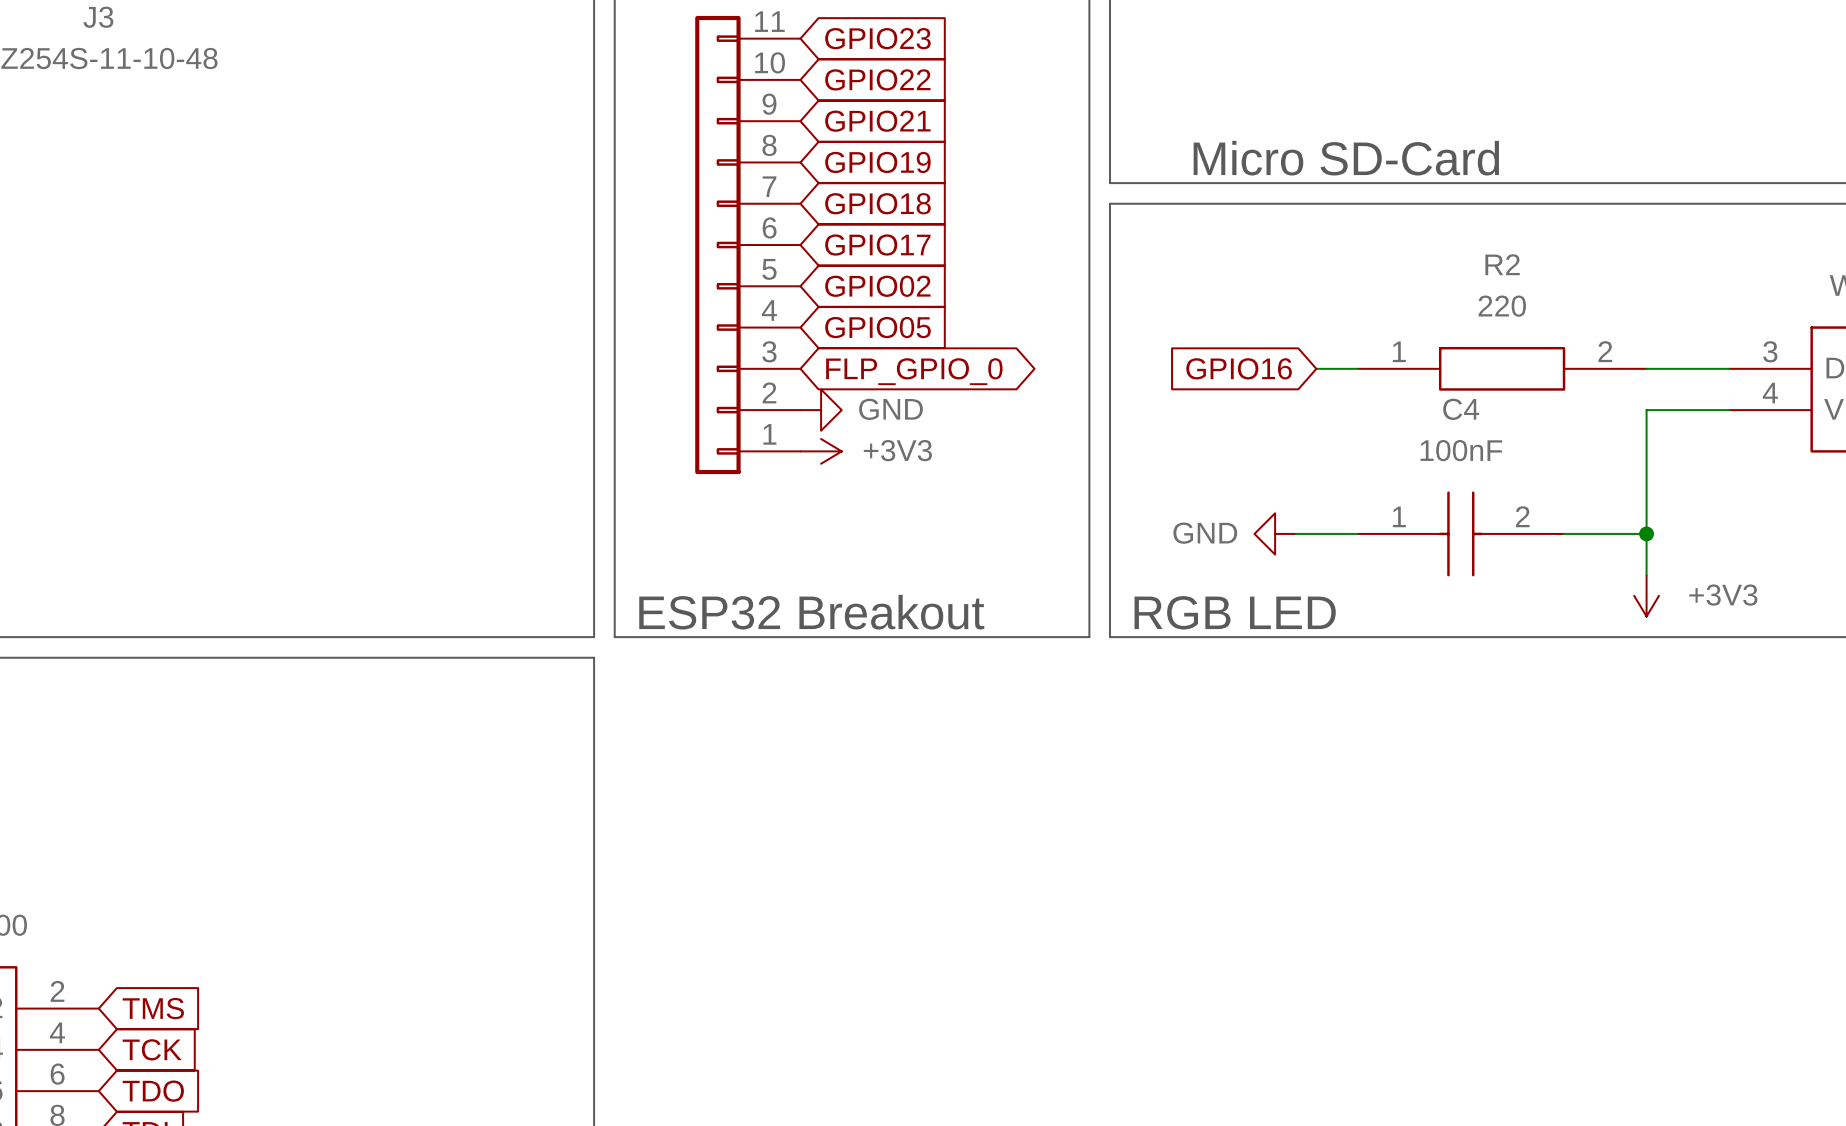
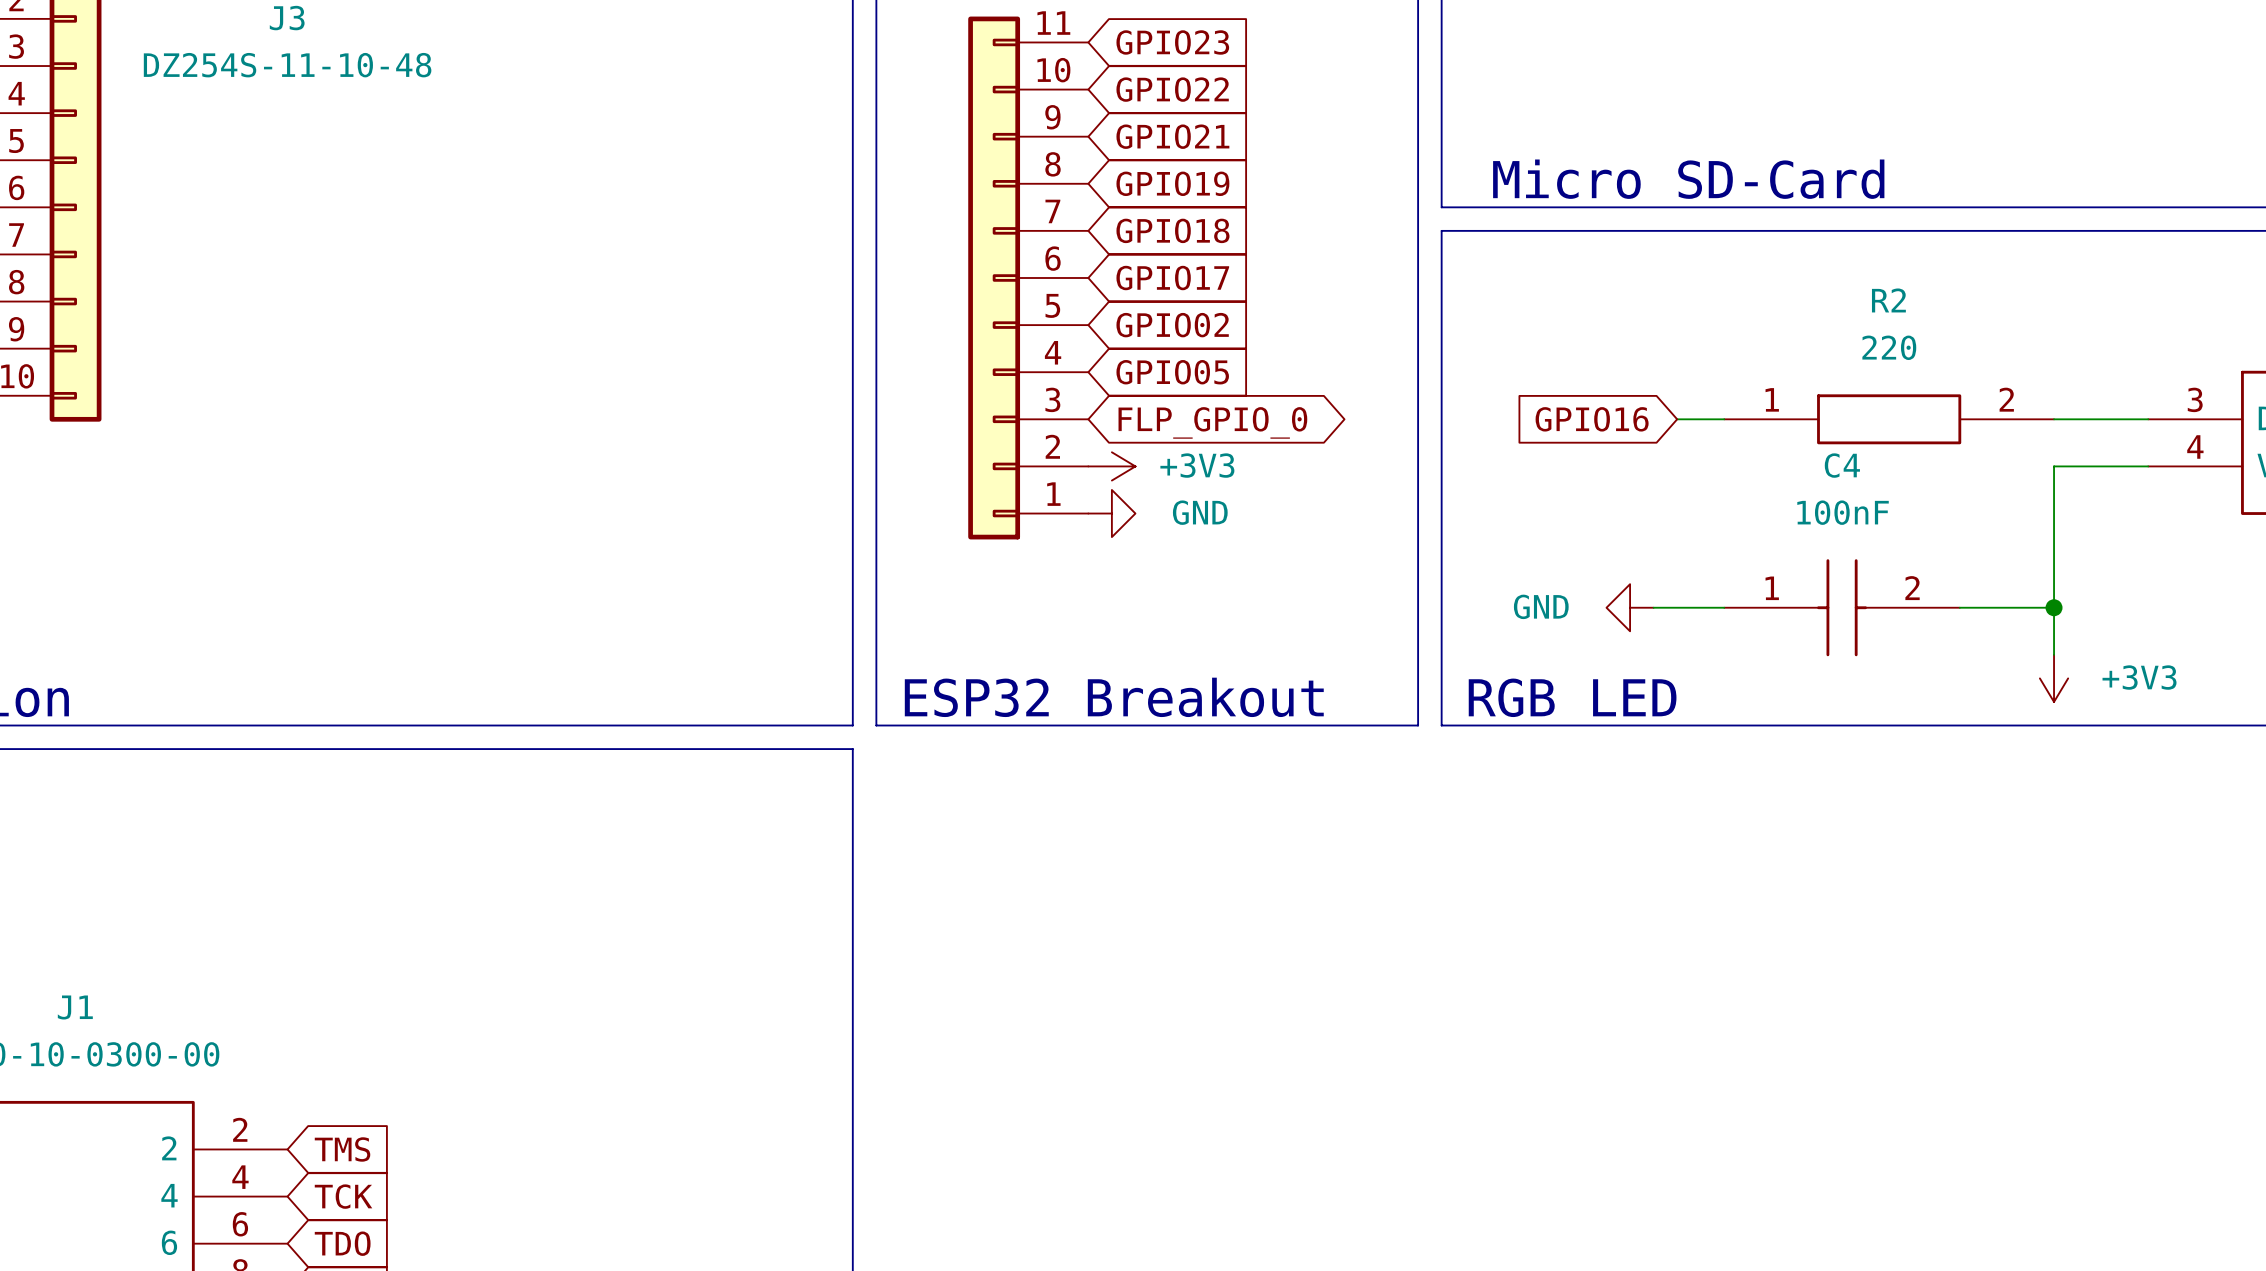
power symbol: GND (821, 410) -> +3V3 (1111, 466)
power symbol: +3V3 (821, 451) -> GND (1111, 513)

